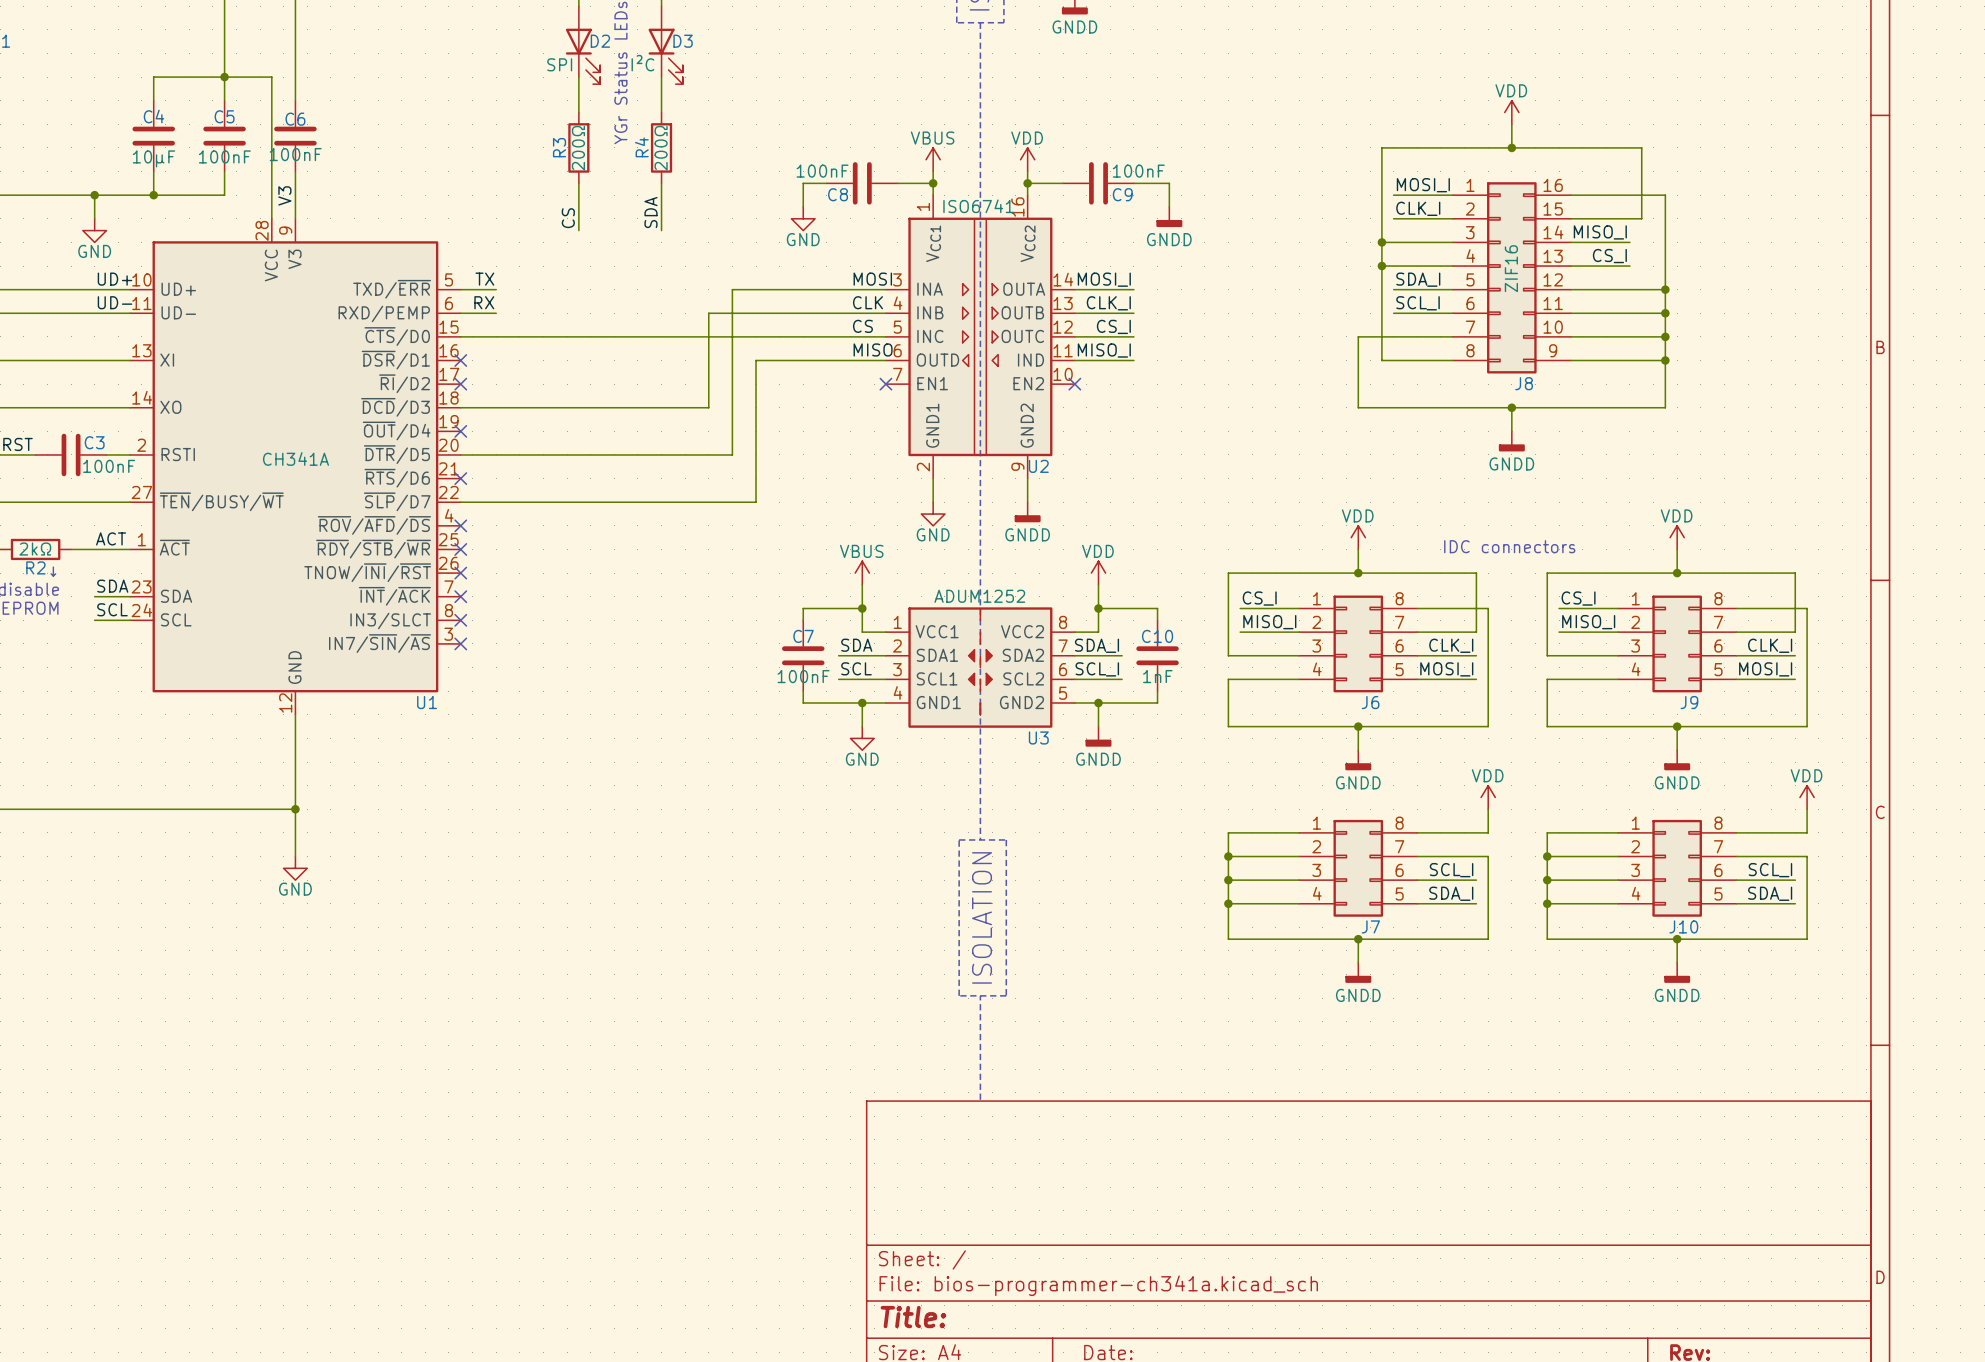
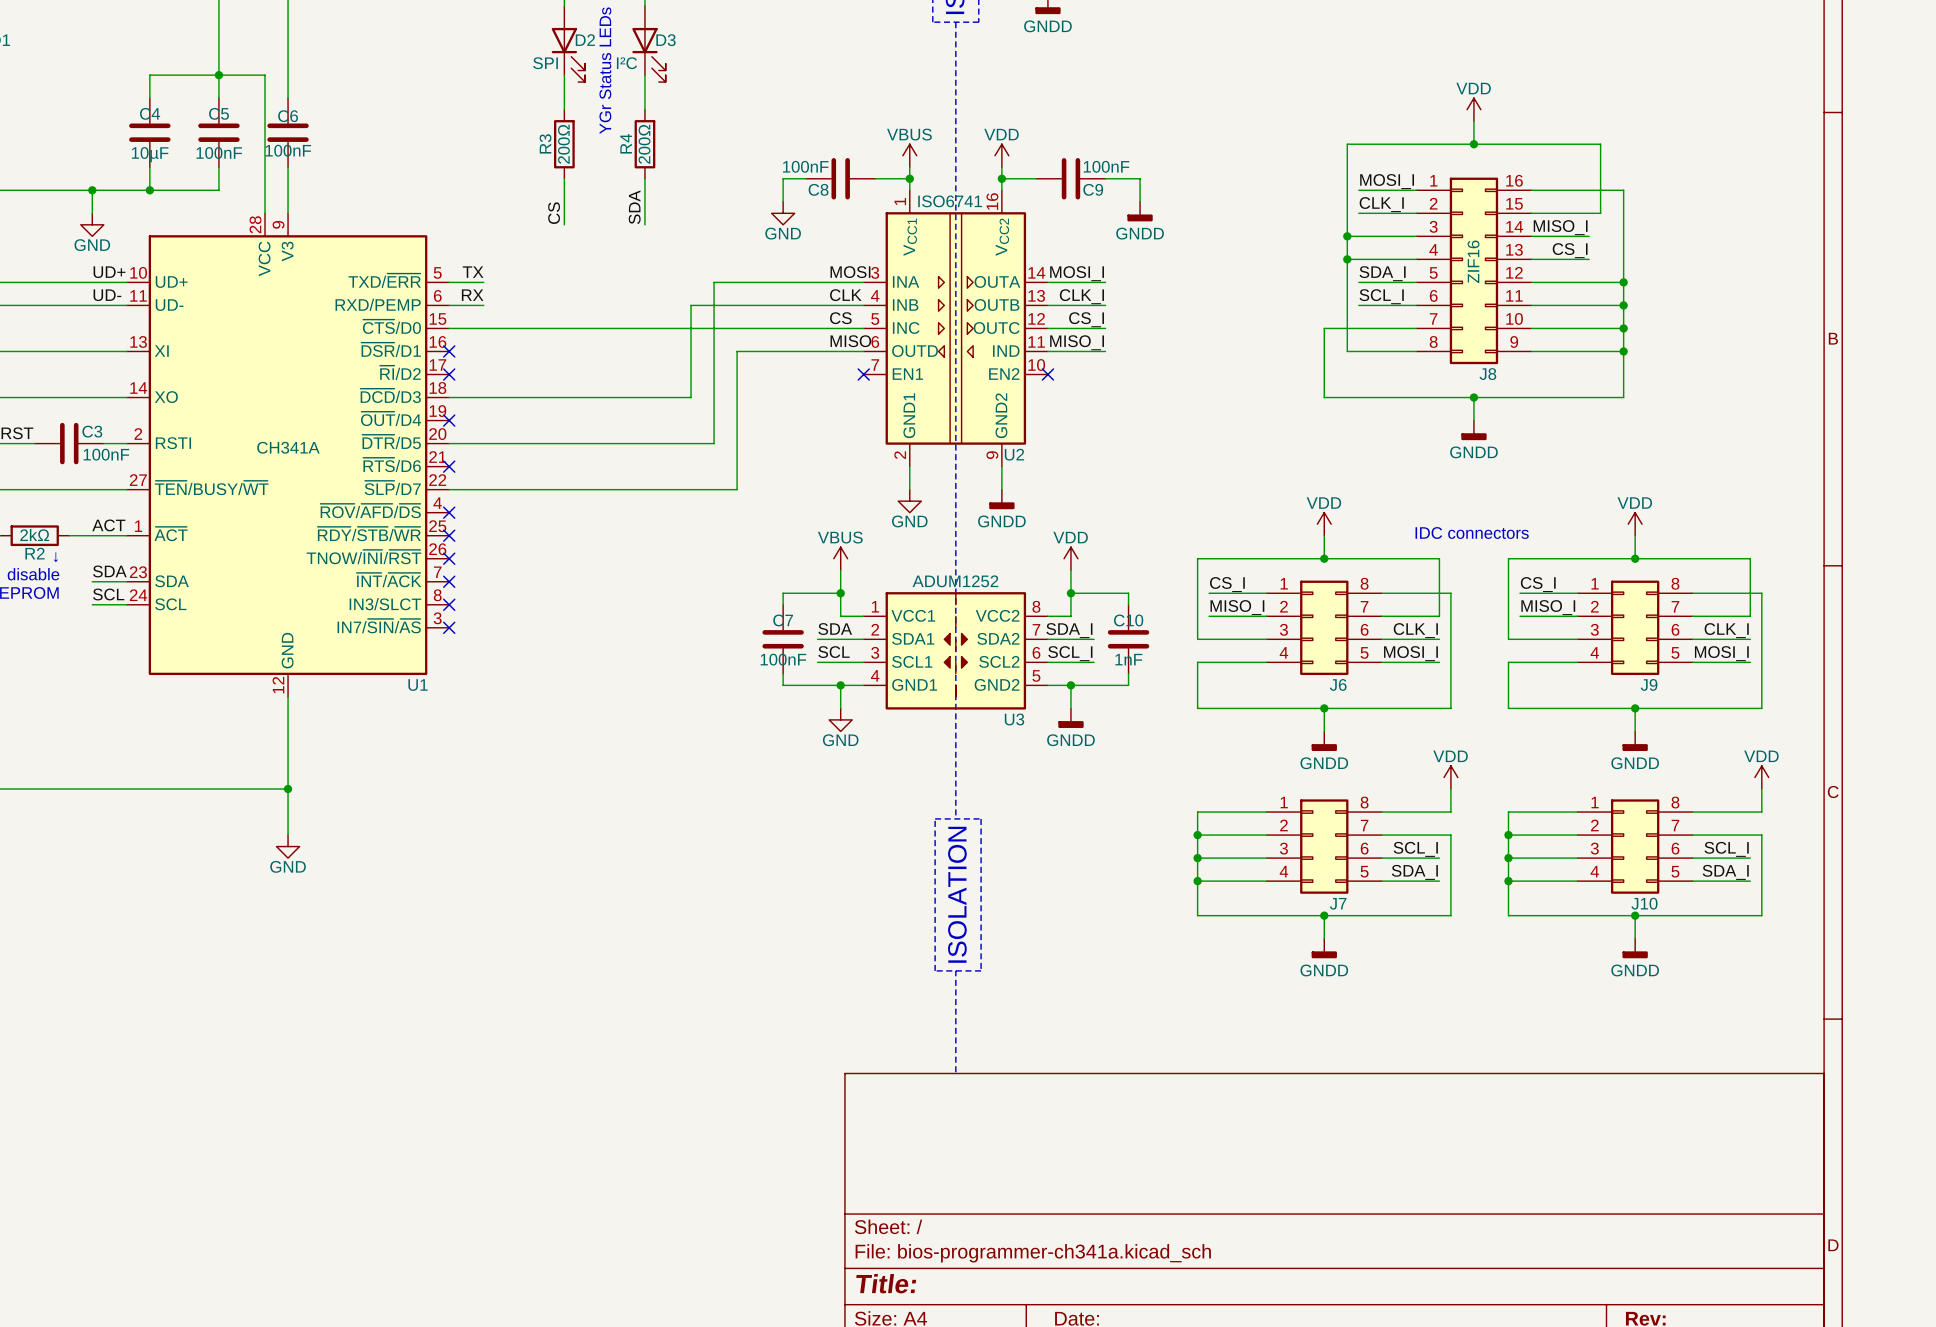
label: V3 (284, 195) -> none

